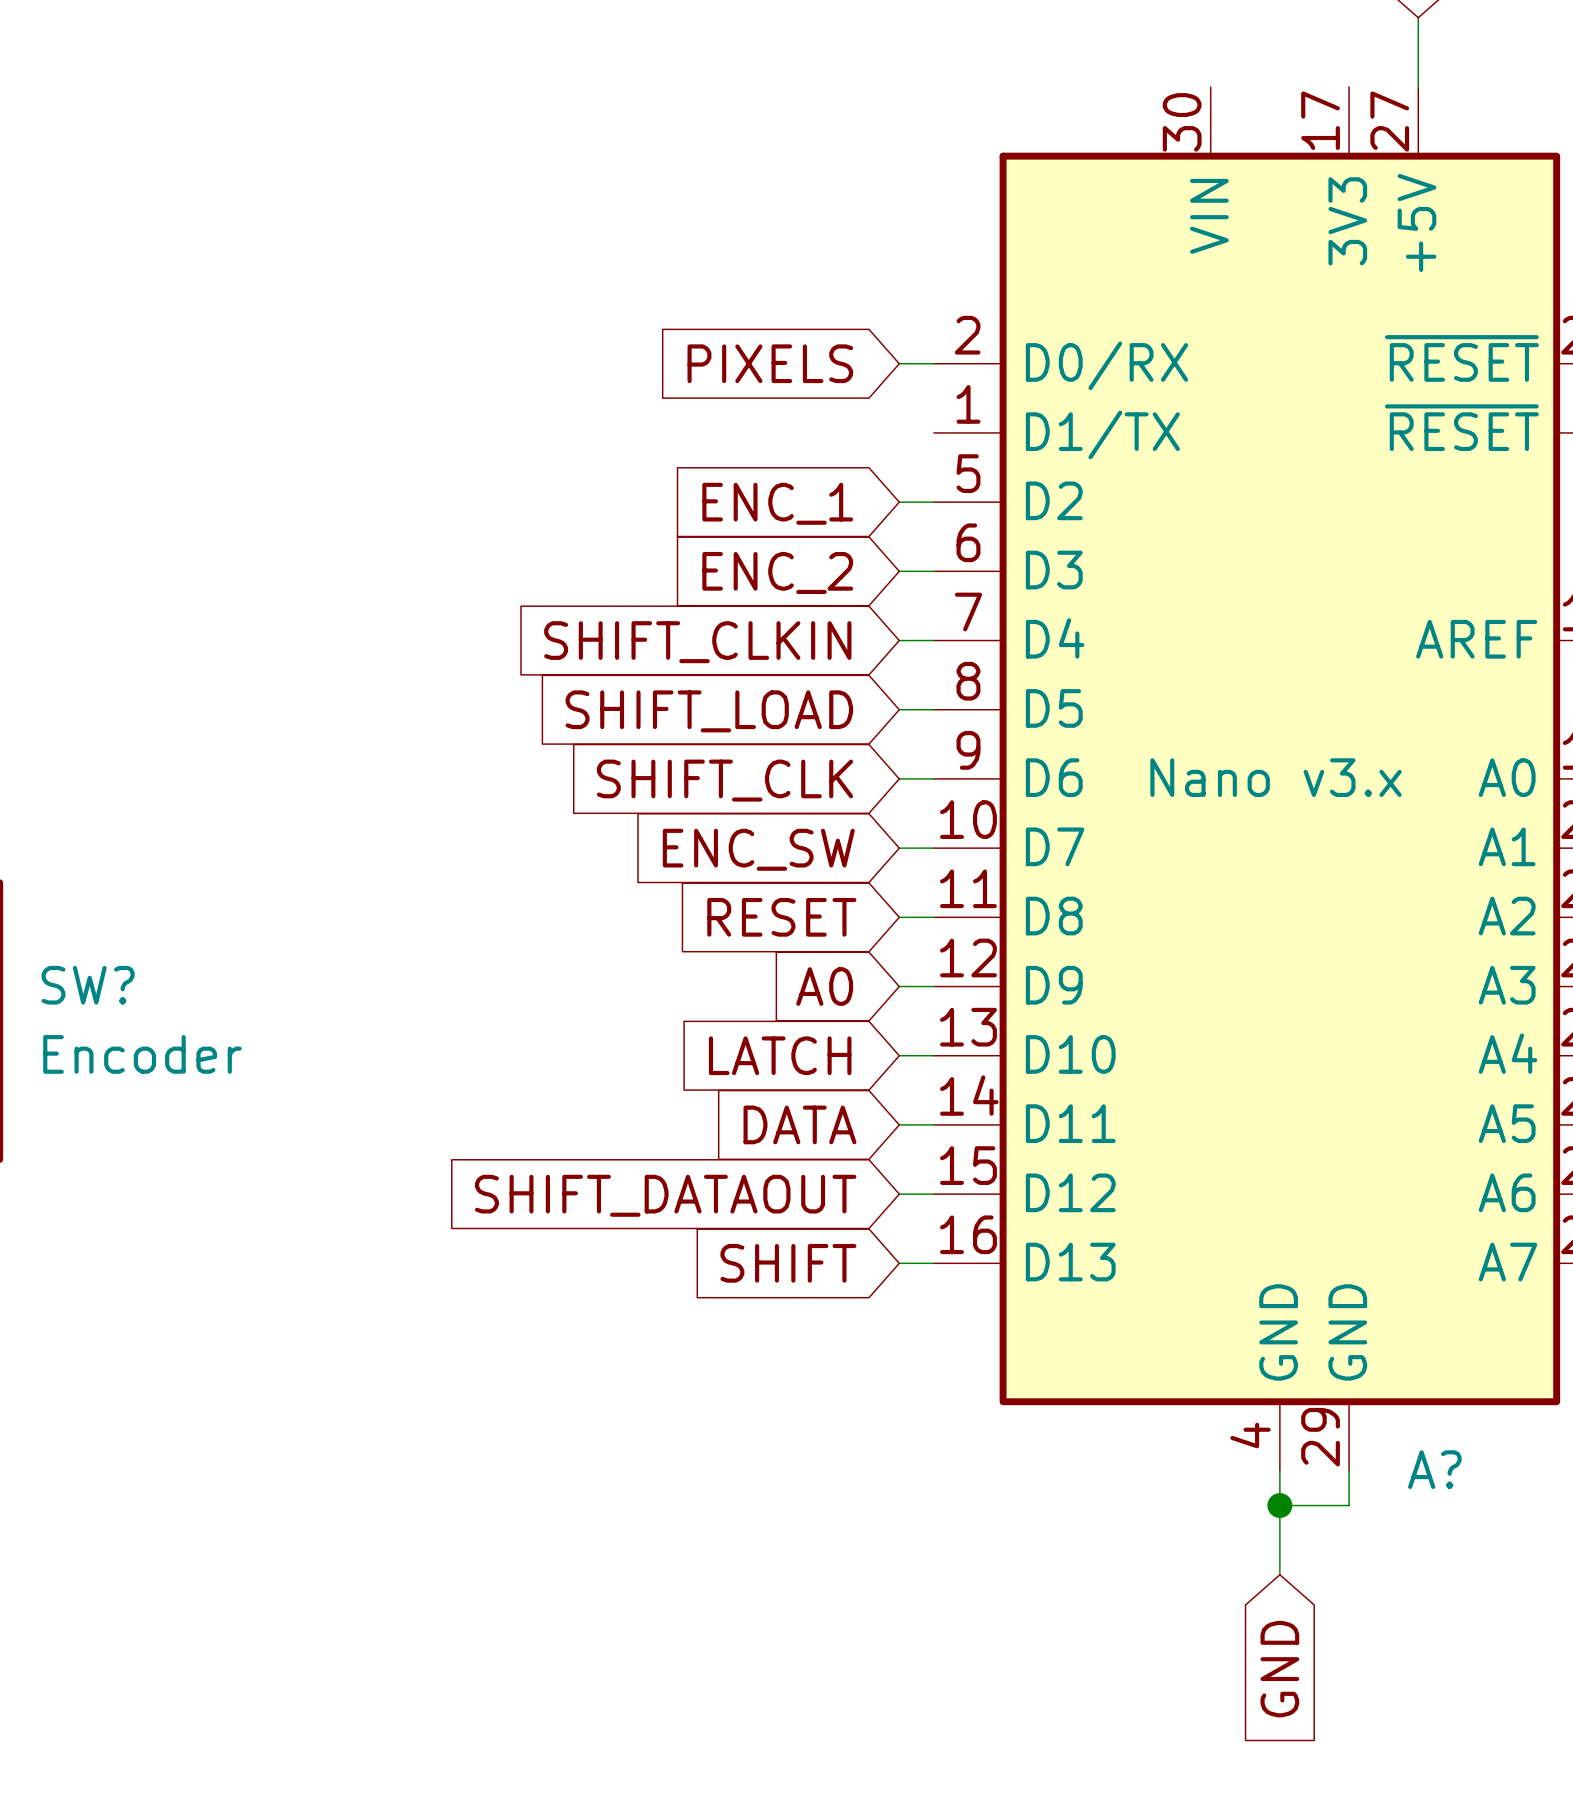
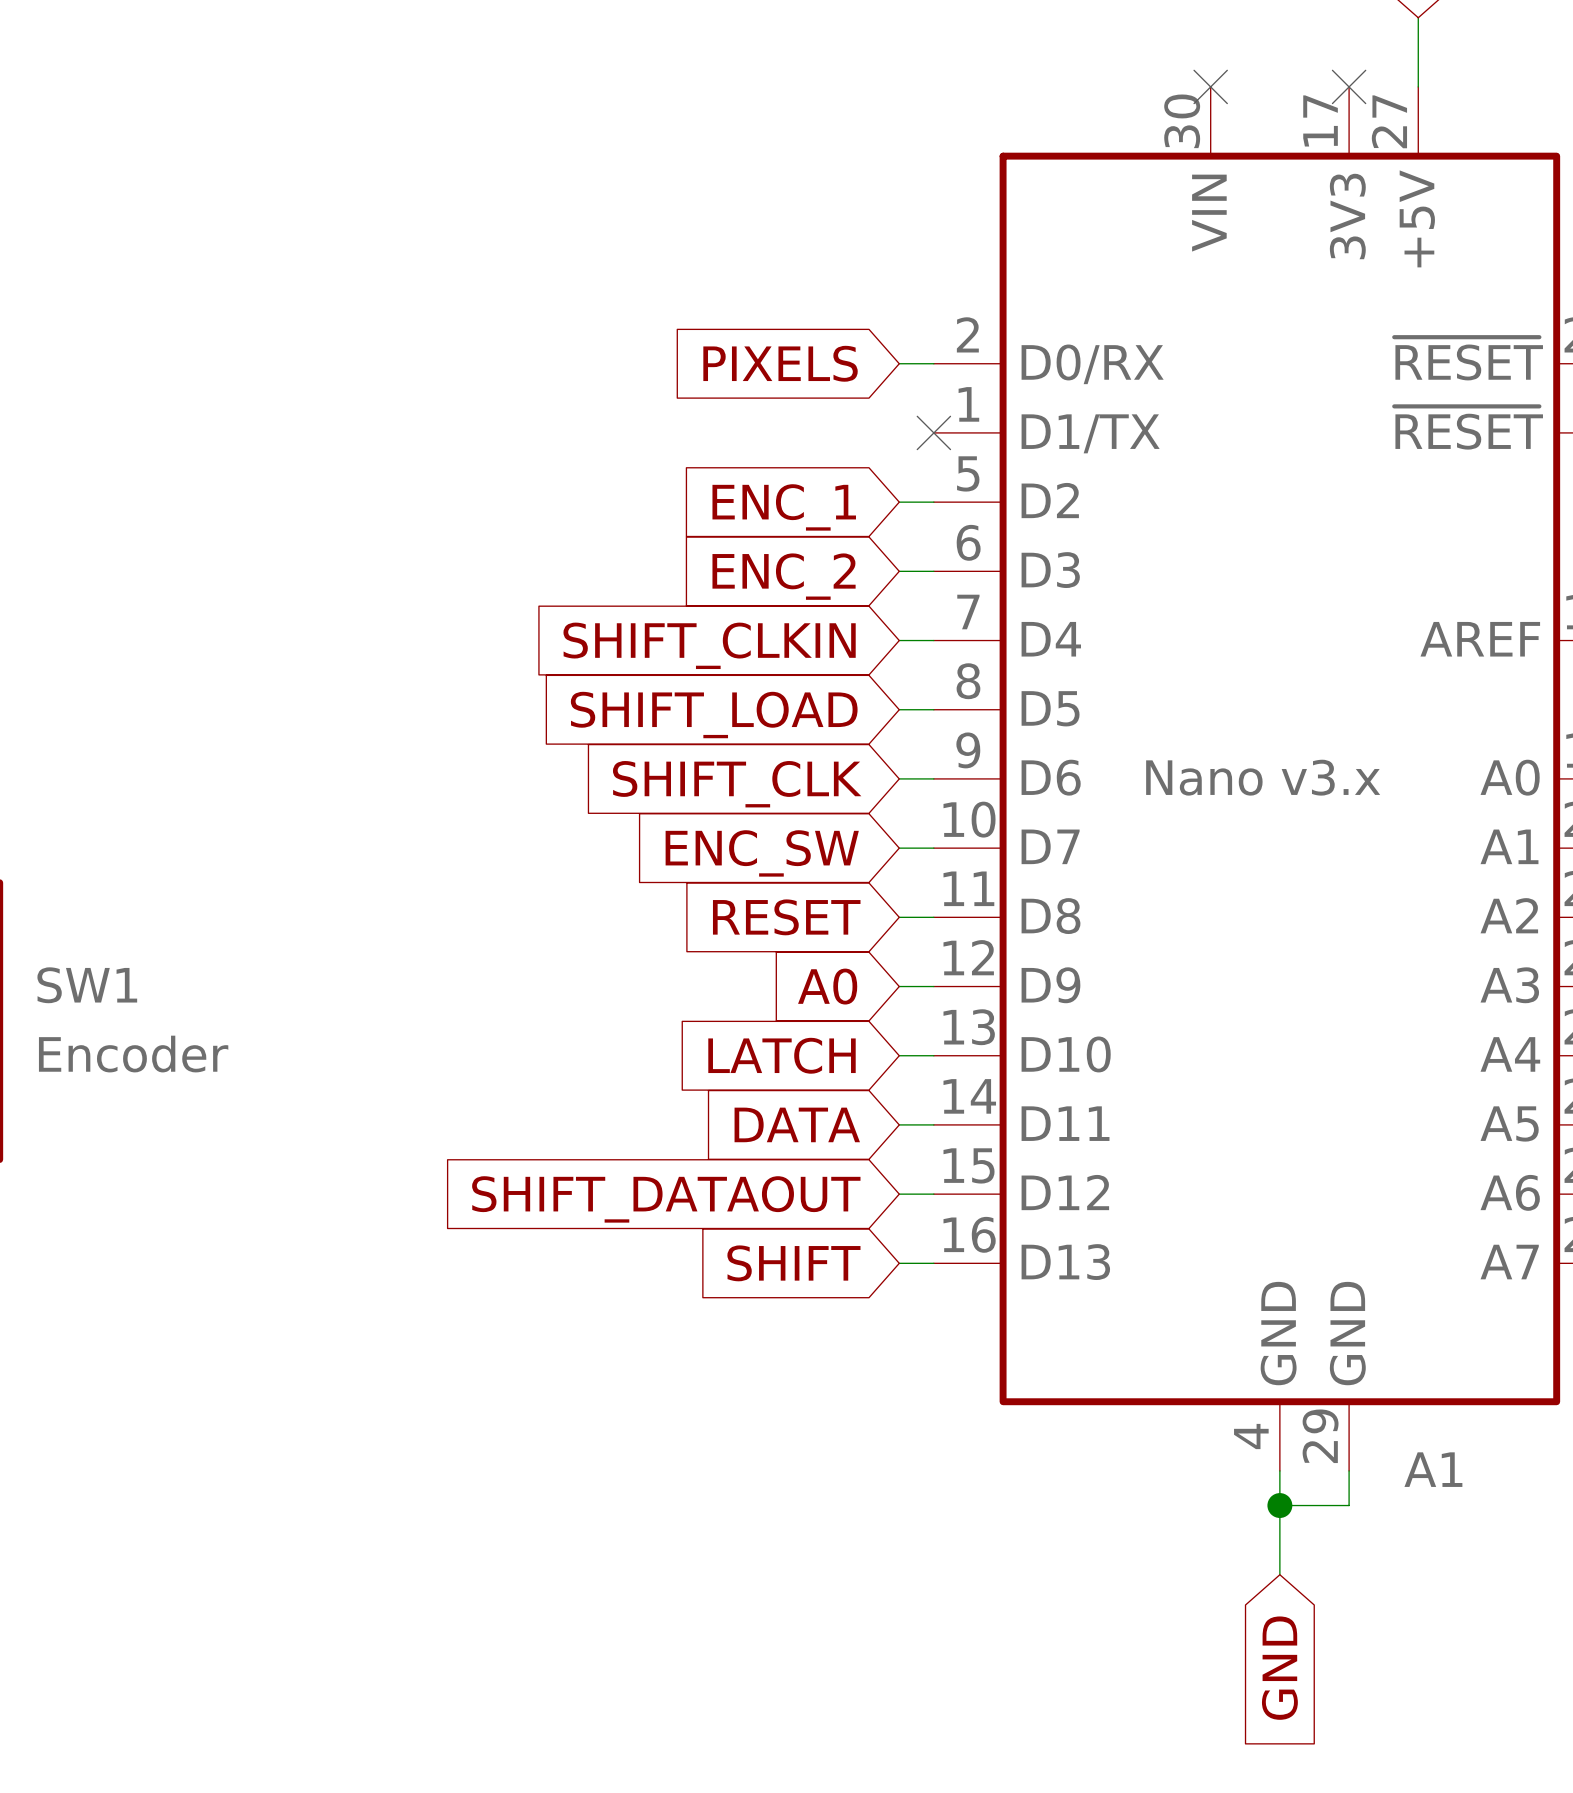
no-connect mark: none -> (1210, 86)
no-connect mark: none -> (1349, 86)
no-connect mark: none -> (933, 432)
SW? name: SW? (88, 985) -> SW1 (87, 985)
A? name: A? (1434, 1469) -> A1 (1433, 1469)

